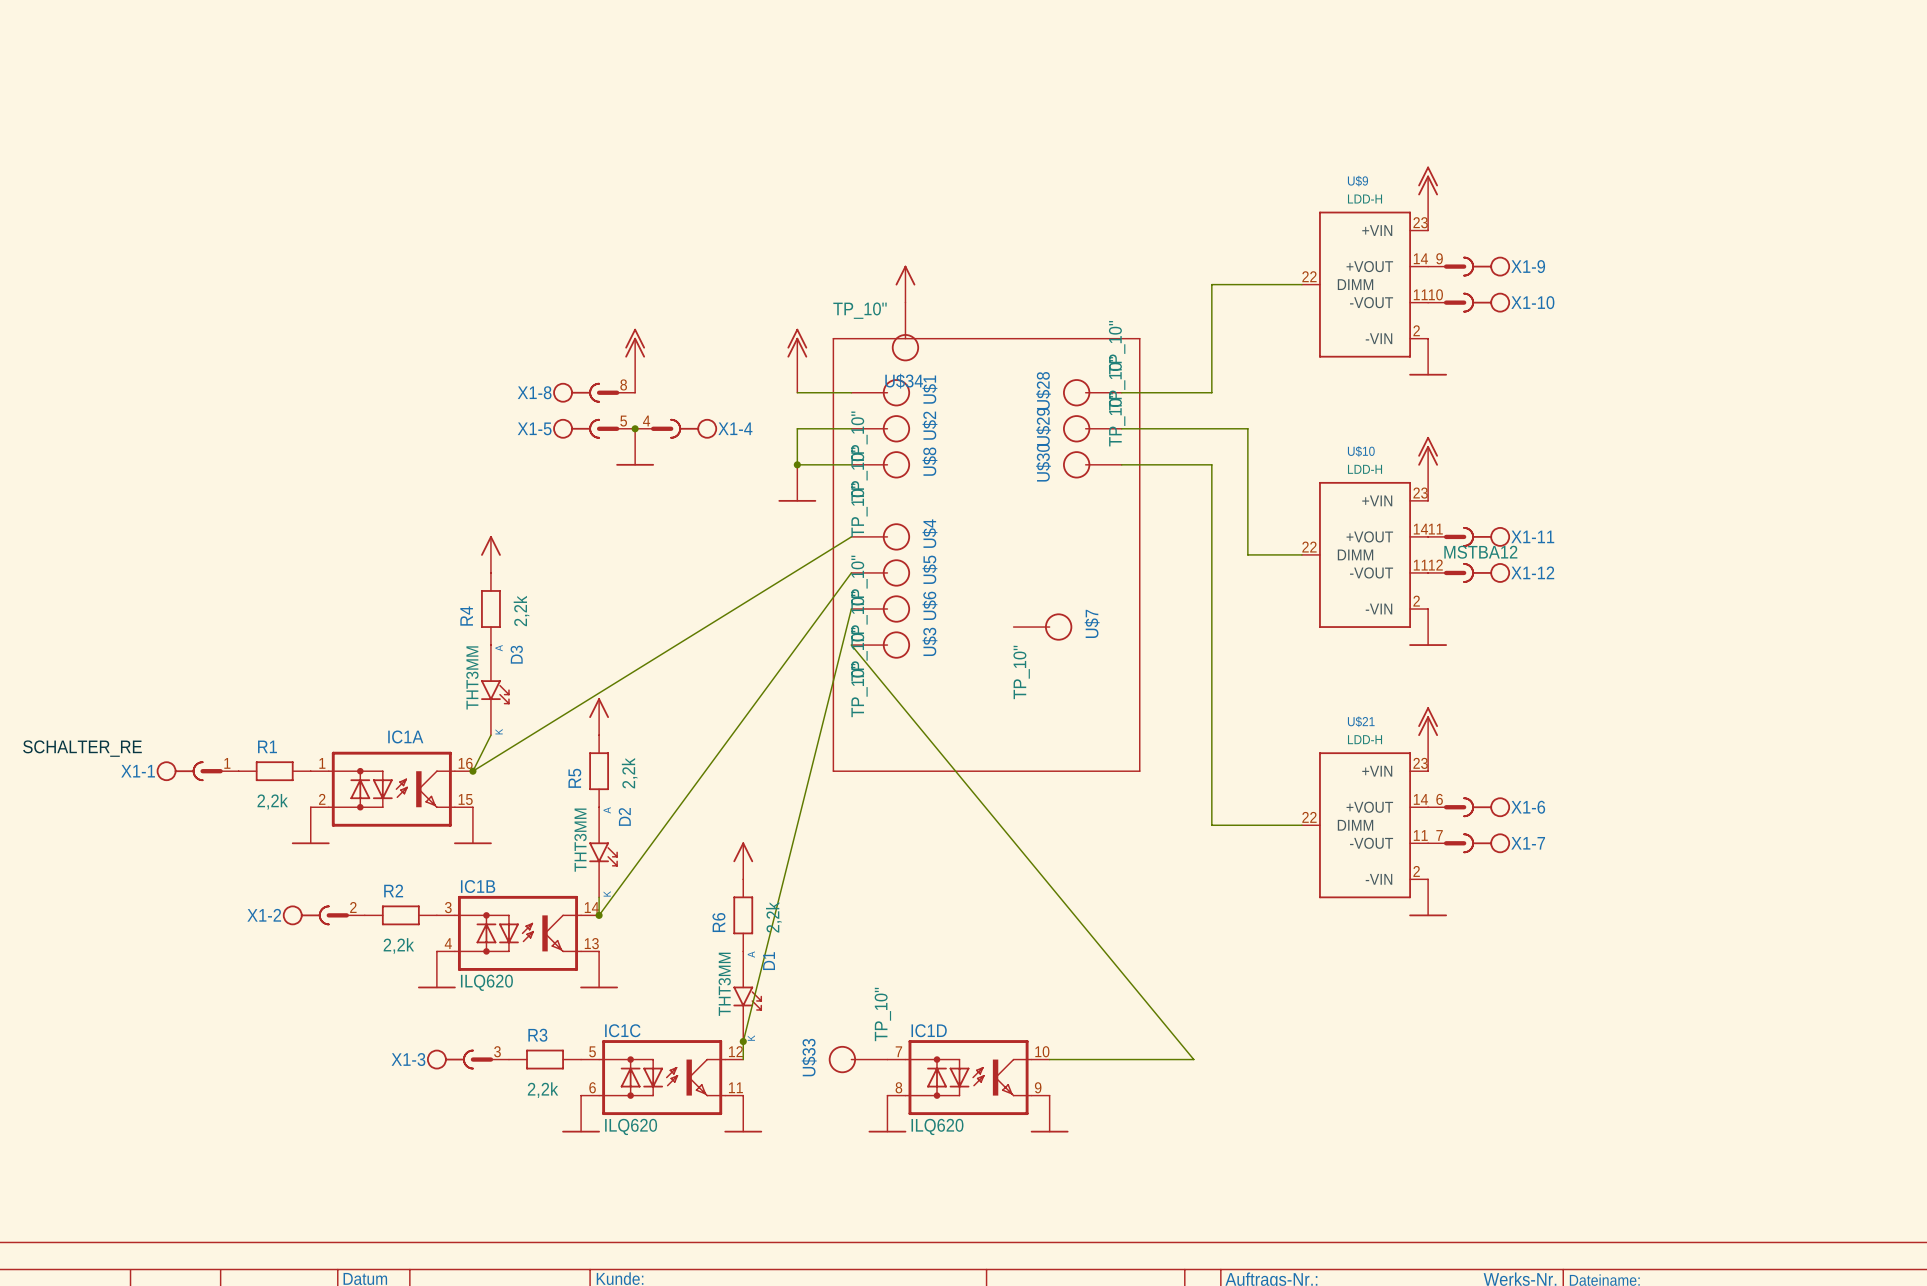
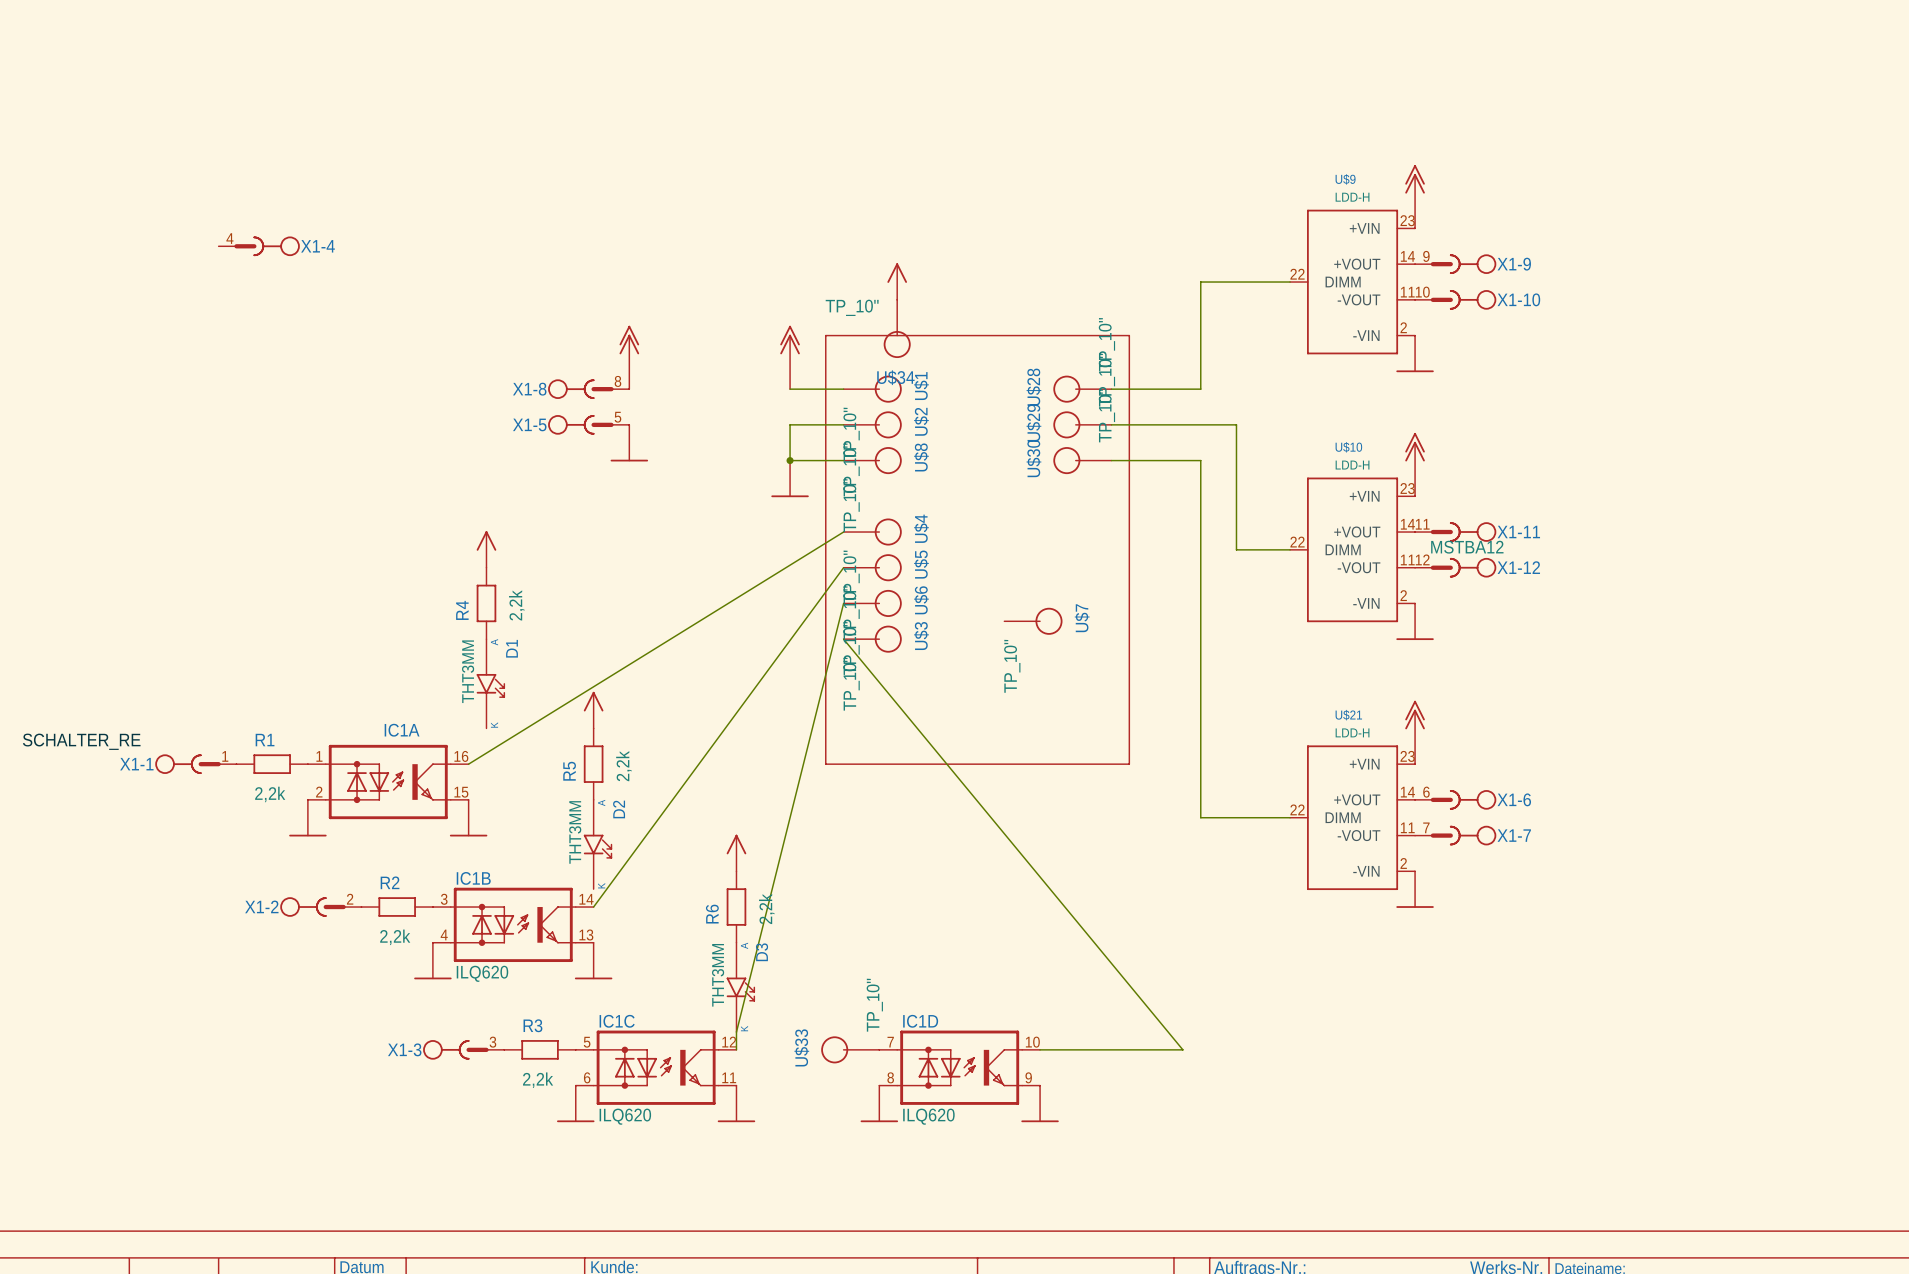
junction: (635, 428) -> none
X1-4 position: (676, 428) -> (259, 246)
D3 name: D3 (516, 654) -> D1 (512, 648)
wire: (490, 735) (472, 771) -> none
junction: (472, 771) -> none
wire: (599, 897) (599, 915) -> none
junction: (599, 915) -> none
D1 name: D1 (769, 961) -> D3 (762, 952)
junction: (743, 1041) -> none

